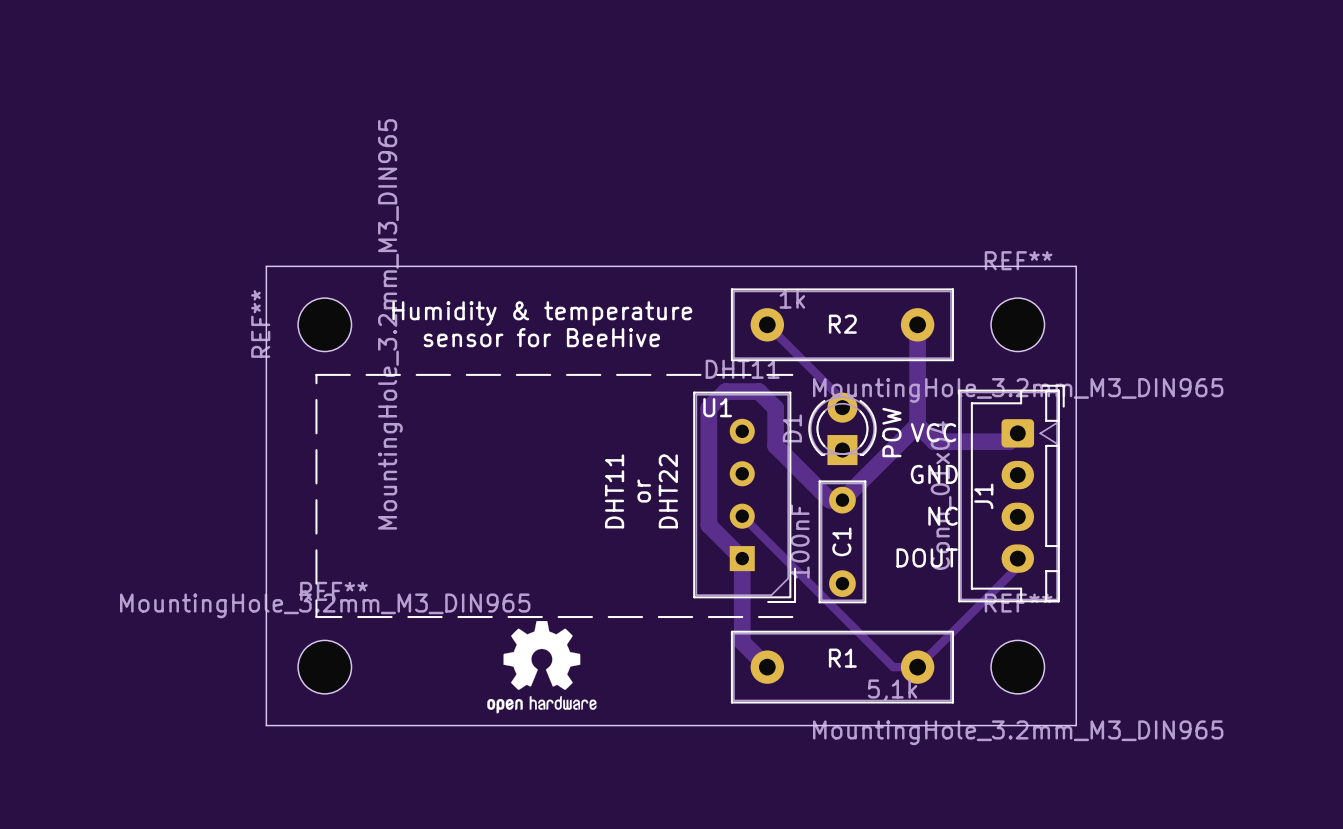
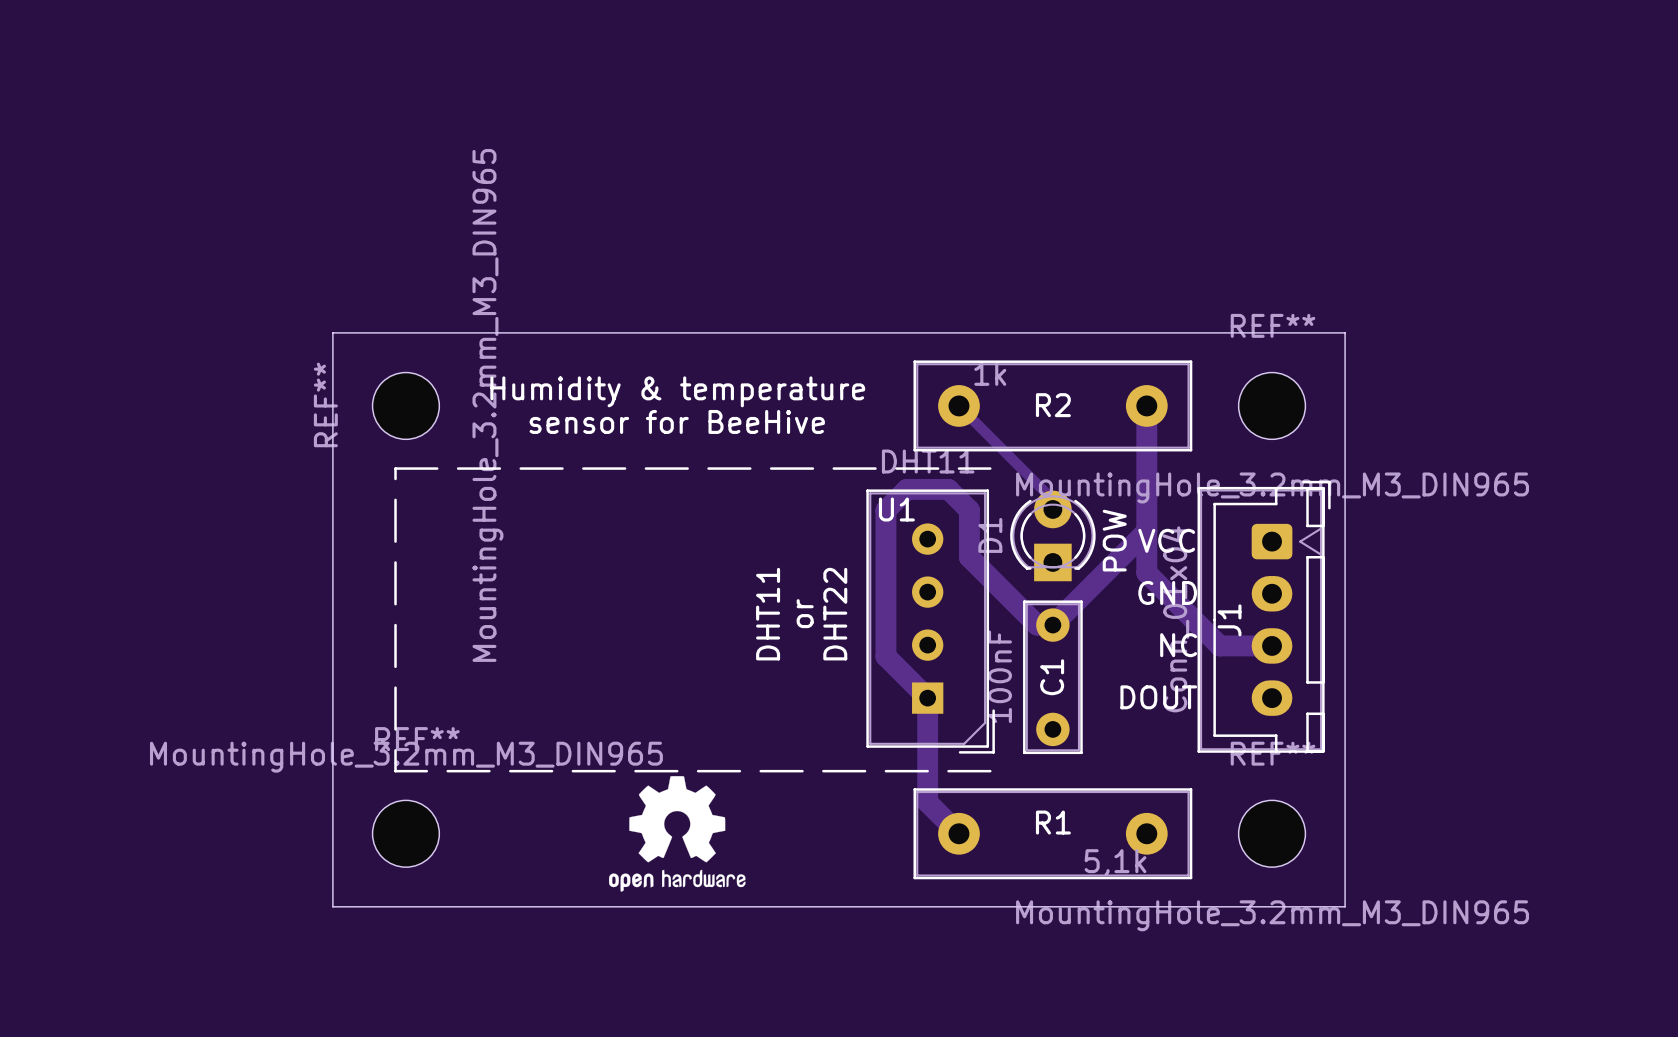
track: (917, 425) (934, 441) (1009, 441) (1017, 433) -> (1146, 531) (1146, 572) (1219, 645) (1272, 645)
track: (742, 516) (893, 667) (917, 667) (1017, 566) (1017, 558) -> none

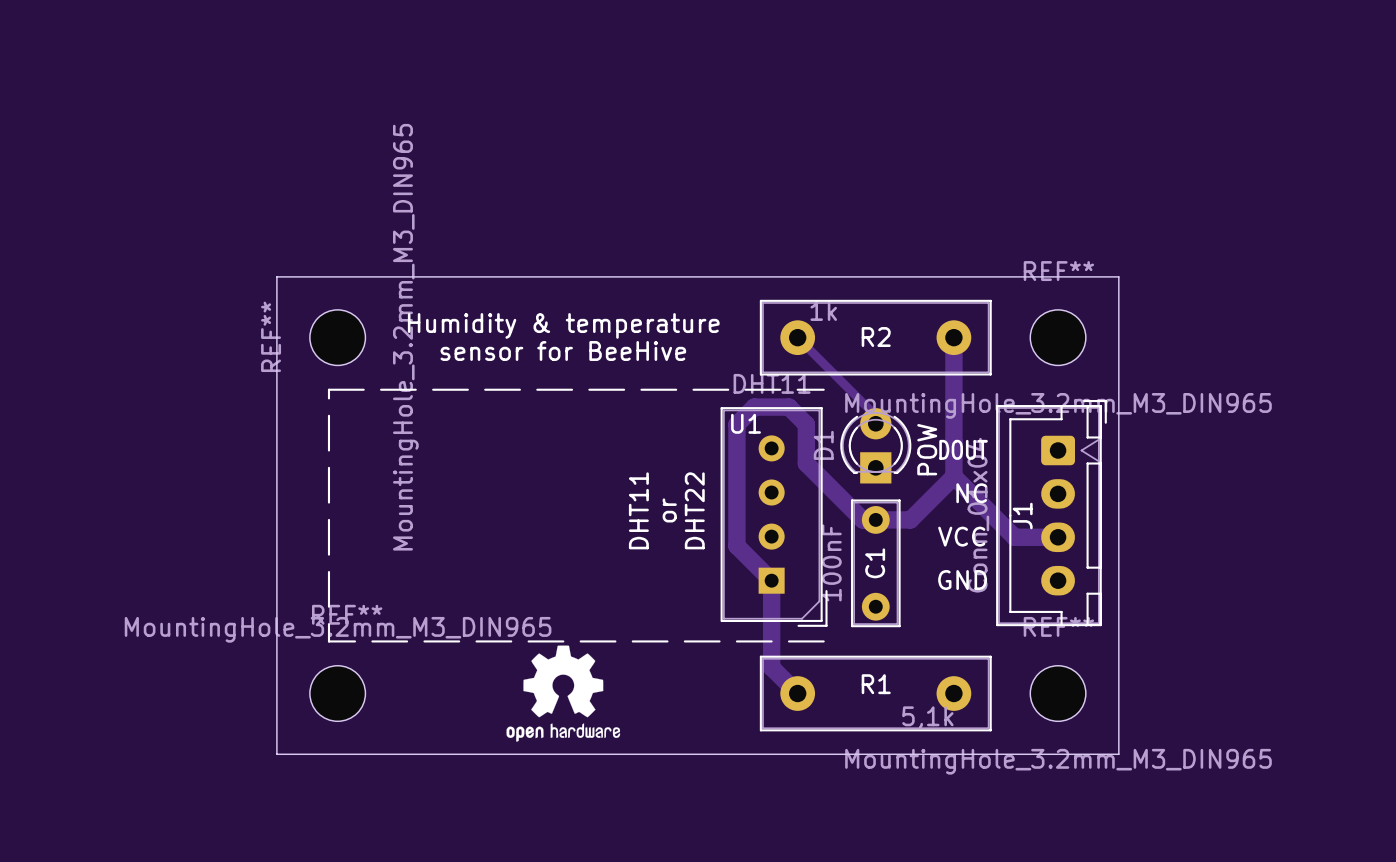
track: (1146, 531) (1052, 625) -> (953, 476) (910, 519) (875, 519)
text: VCC (1166, 540) -> DOUT (963, 449)
text: GND (1167, 592) -> NC (971, 493)
text: NC (1178, 645) -> VCC (961, 536)
text: DOUT (1158, 697) -> GND (962, 580)

